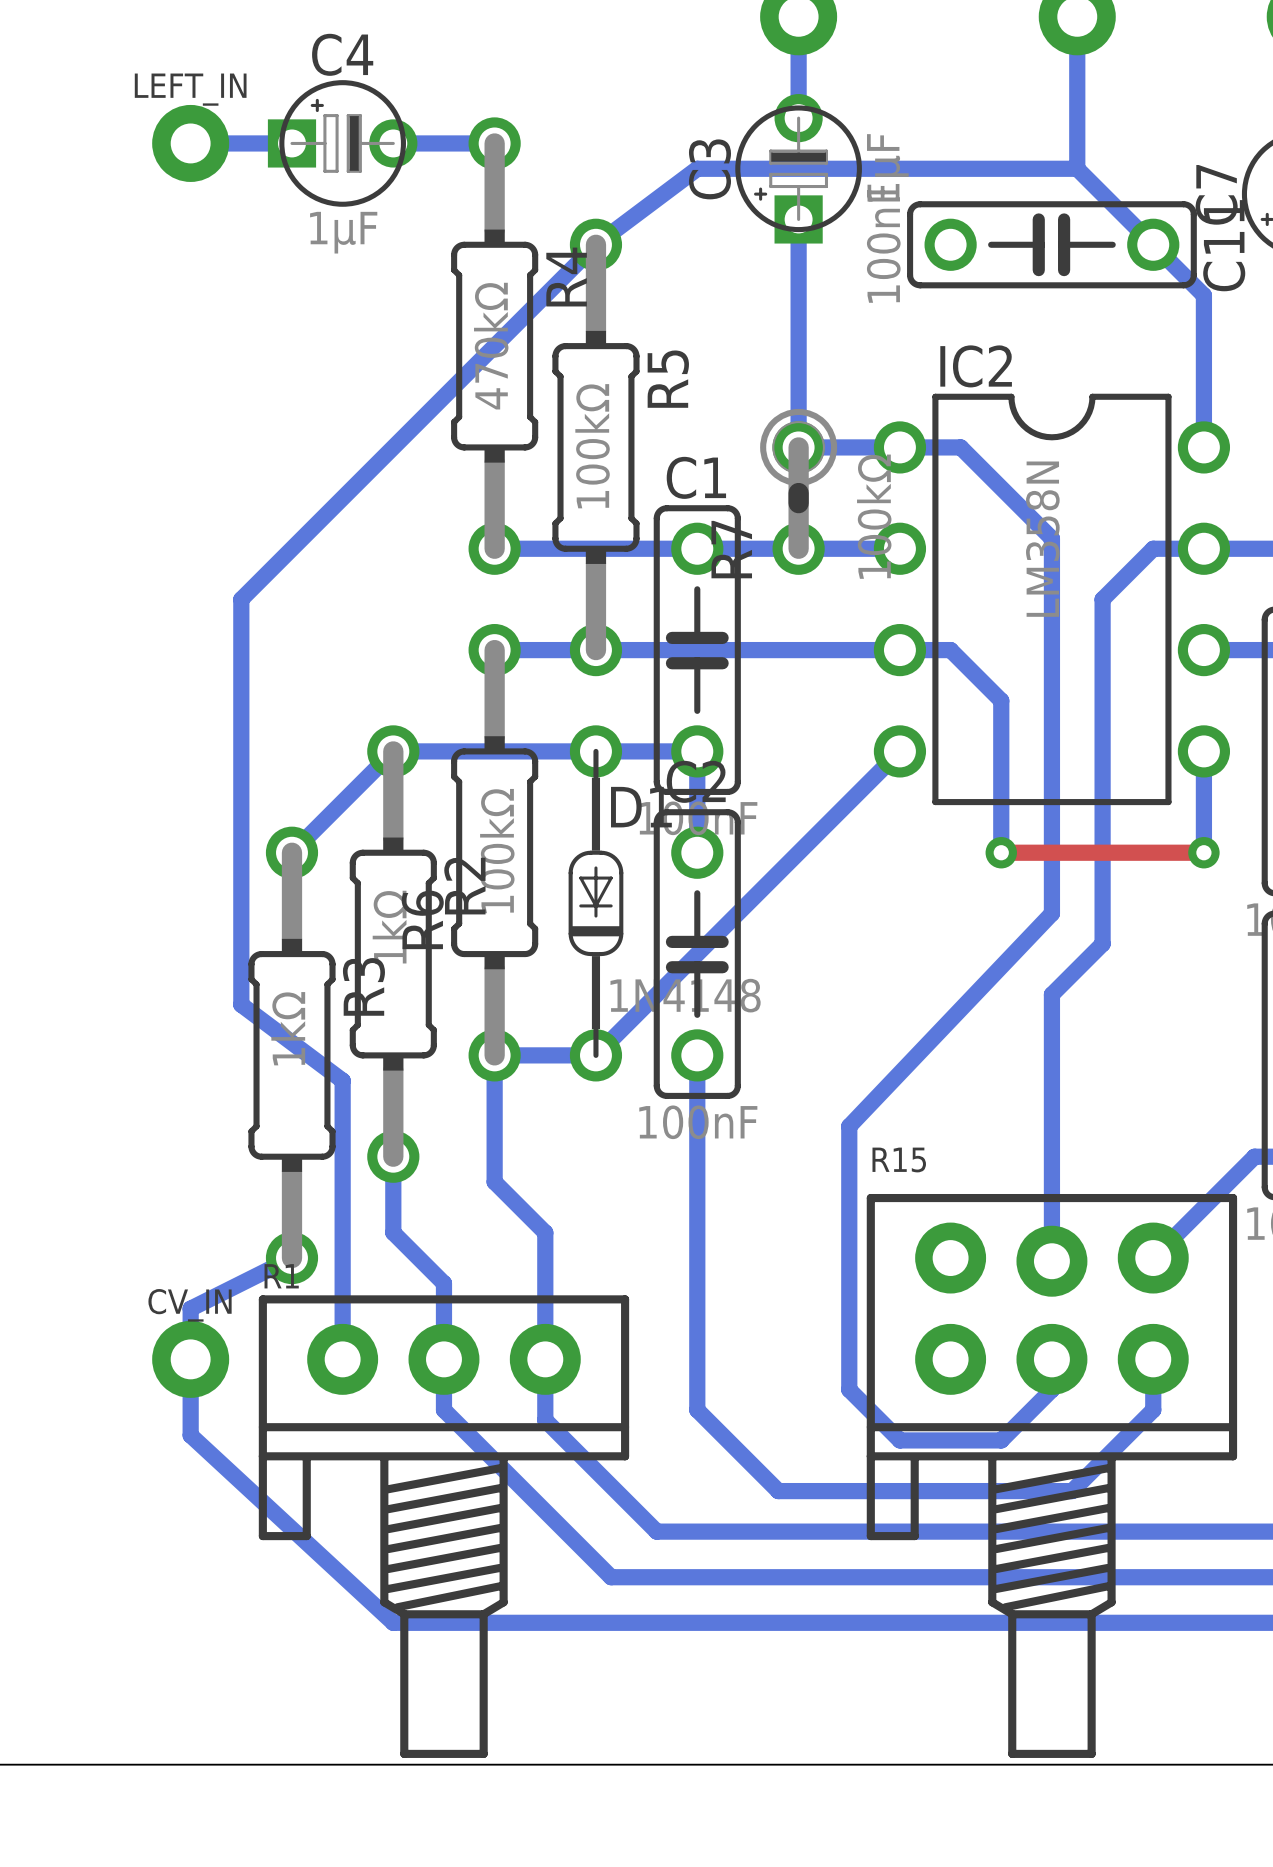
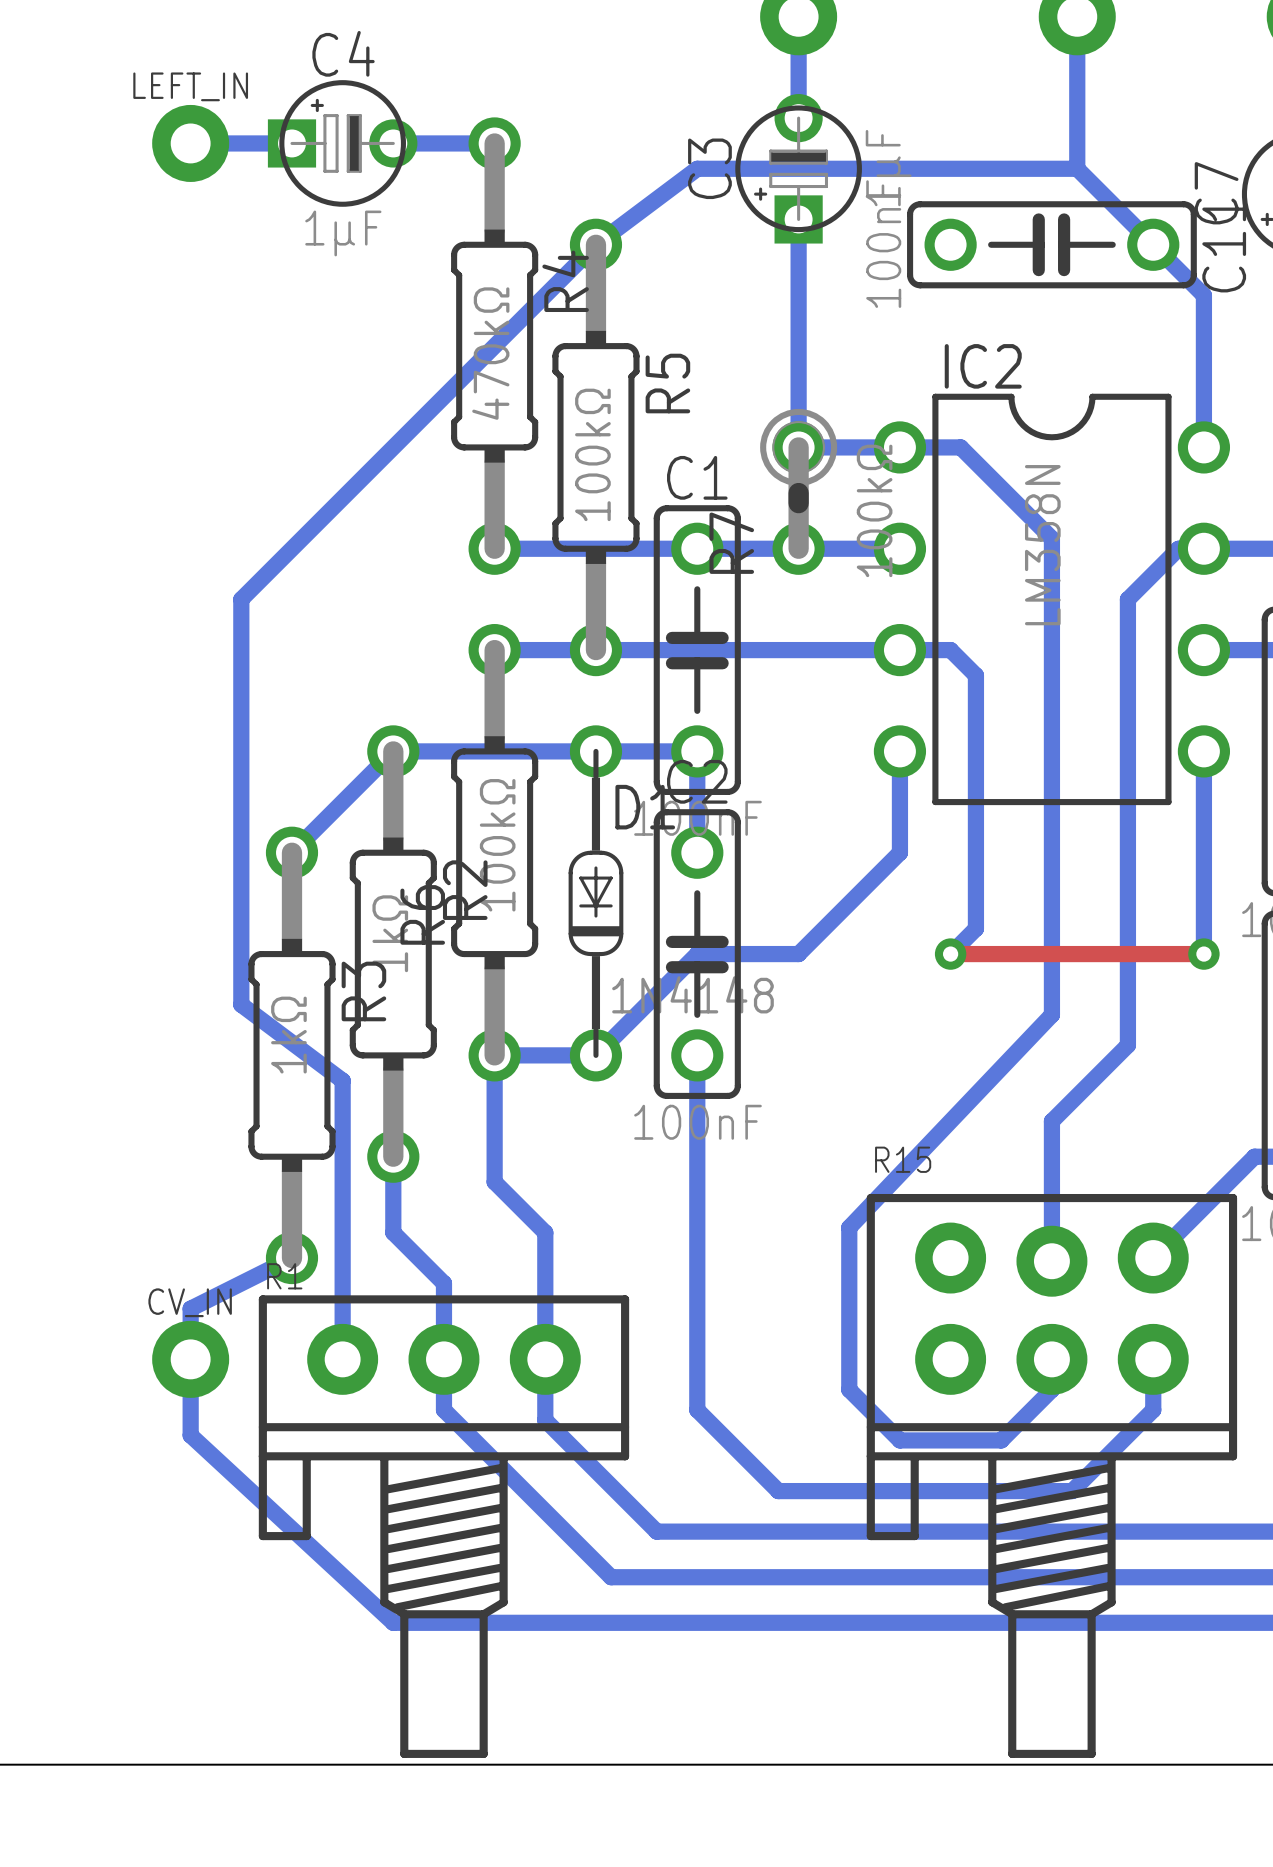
bottom track: (1178, 548) (1153, 548) (1102, 599) (1102, 943) (1051, 994) -> (1178, 548) (1127, 599) (1127, 1045) (1051, 1121)
bottom track: (975, 675) (1001, 700) (1001, 852) -> (975, 675) (975, 928) (950, 954)
bottom track: (899, 751) (697, 954) -> (899, 751) (899, 852) (798, 954) (697, 954)
top track: (1001, 852) (1203, 852) -> none
via: (1001, 852) -> none
bottom track: none -> (1203, 852) (1203, 954)
via position: (1203, 852) -> (1203, 954)
bottom track: (1051, 913) (849, 1126) (849, 1227) -> (1051, 1014) (849, 1227)
bottom track: none -> (1051, 913) (1051, 994)
top track: none -> (950, 954) (1203, 954)
via: none -> (950, 954)
bottom track: (1051, 1014) (1051, 1121) -> none

